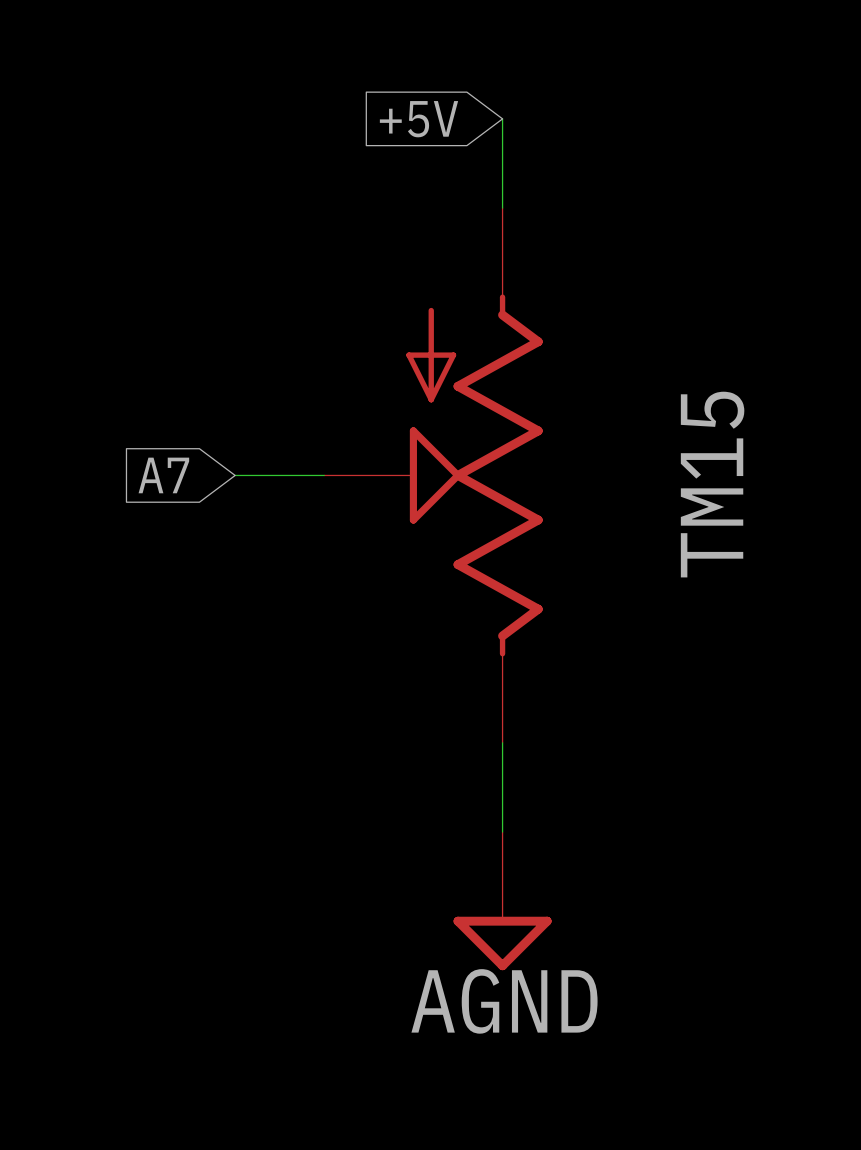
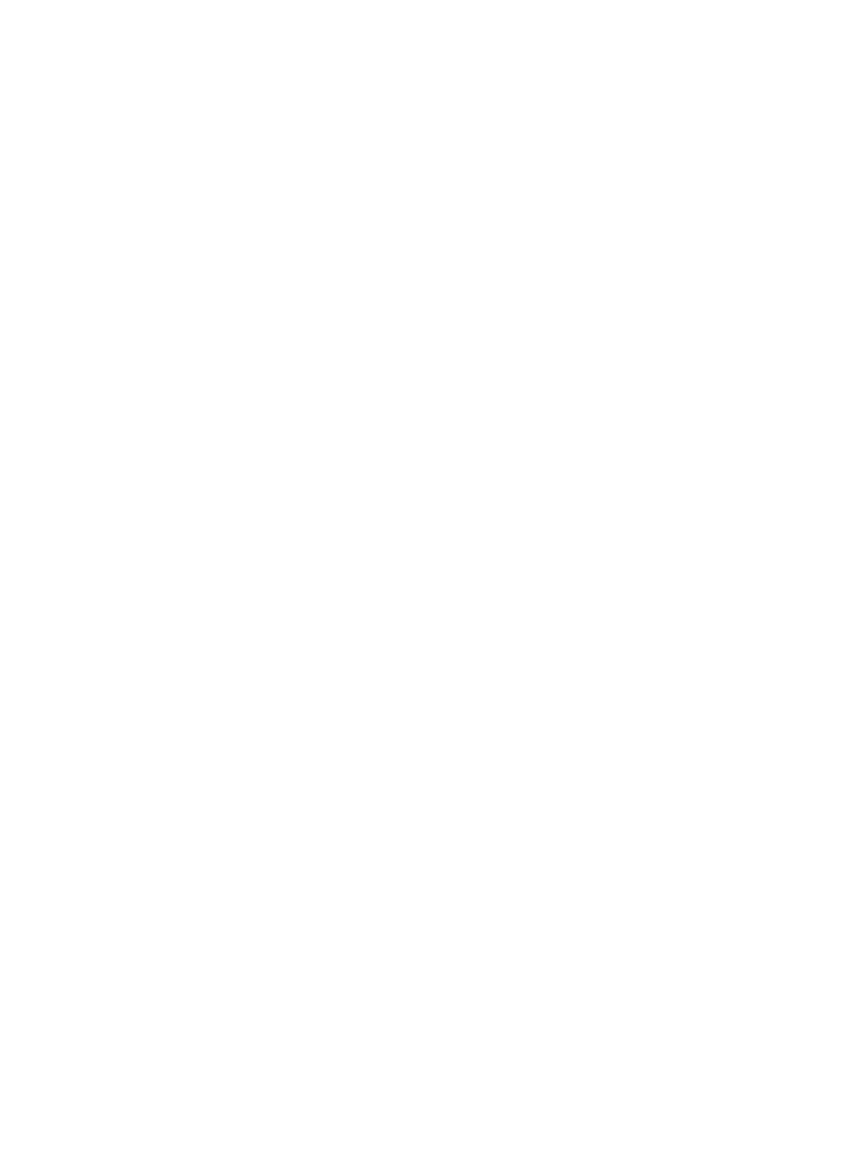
wire: (502, 118) (502, 208) -> none
global label: +5V (418, 119) -> none
global label: A7 (163, 475) -> none
wire: (235, 475) (324, 475) -> none
TM15: (433, 475) -> none
wire: (502, 742) (502, 832) -> none
power symbol: AGND (502, 901) -> none

